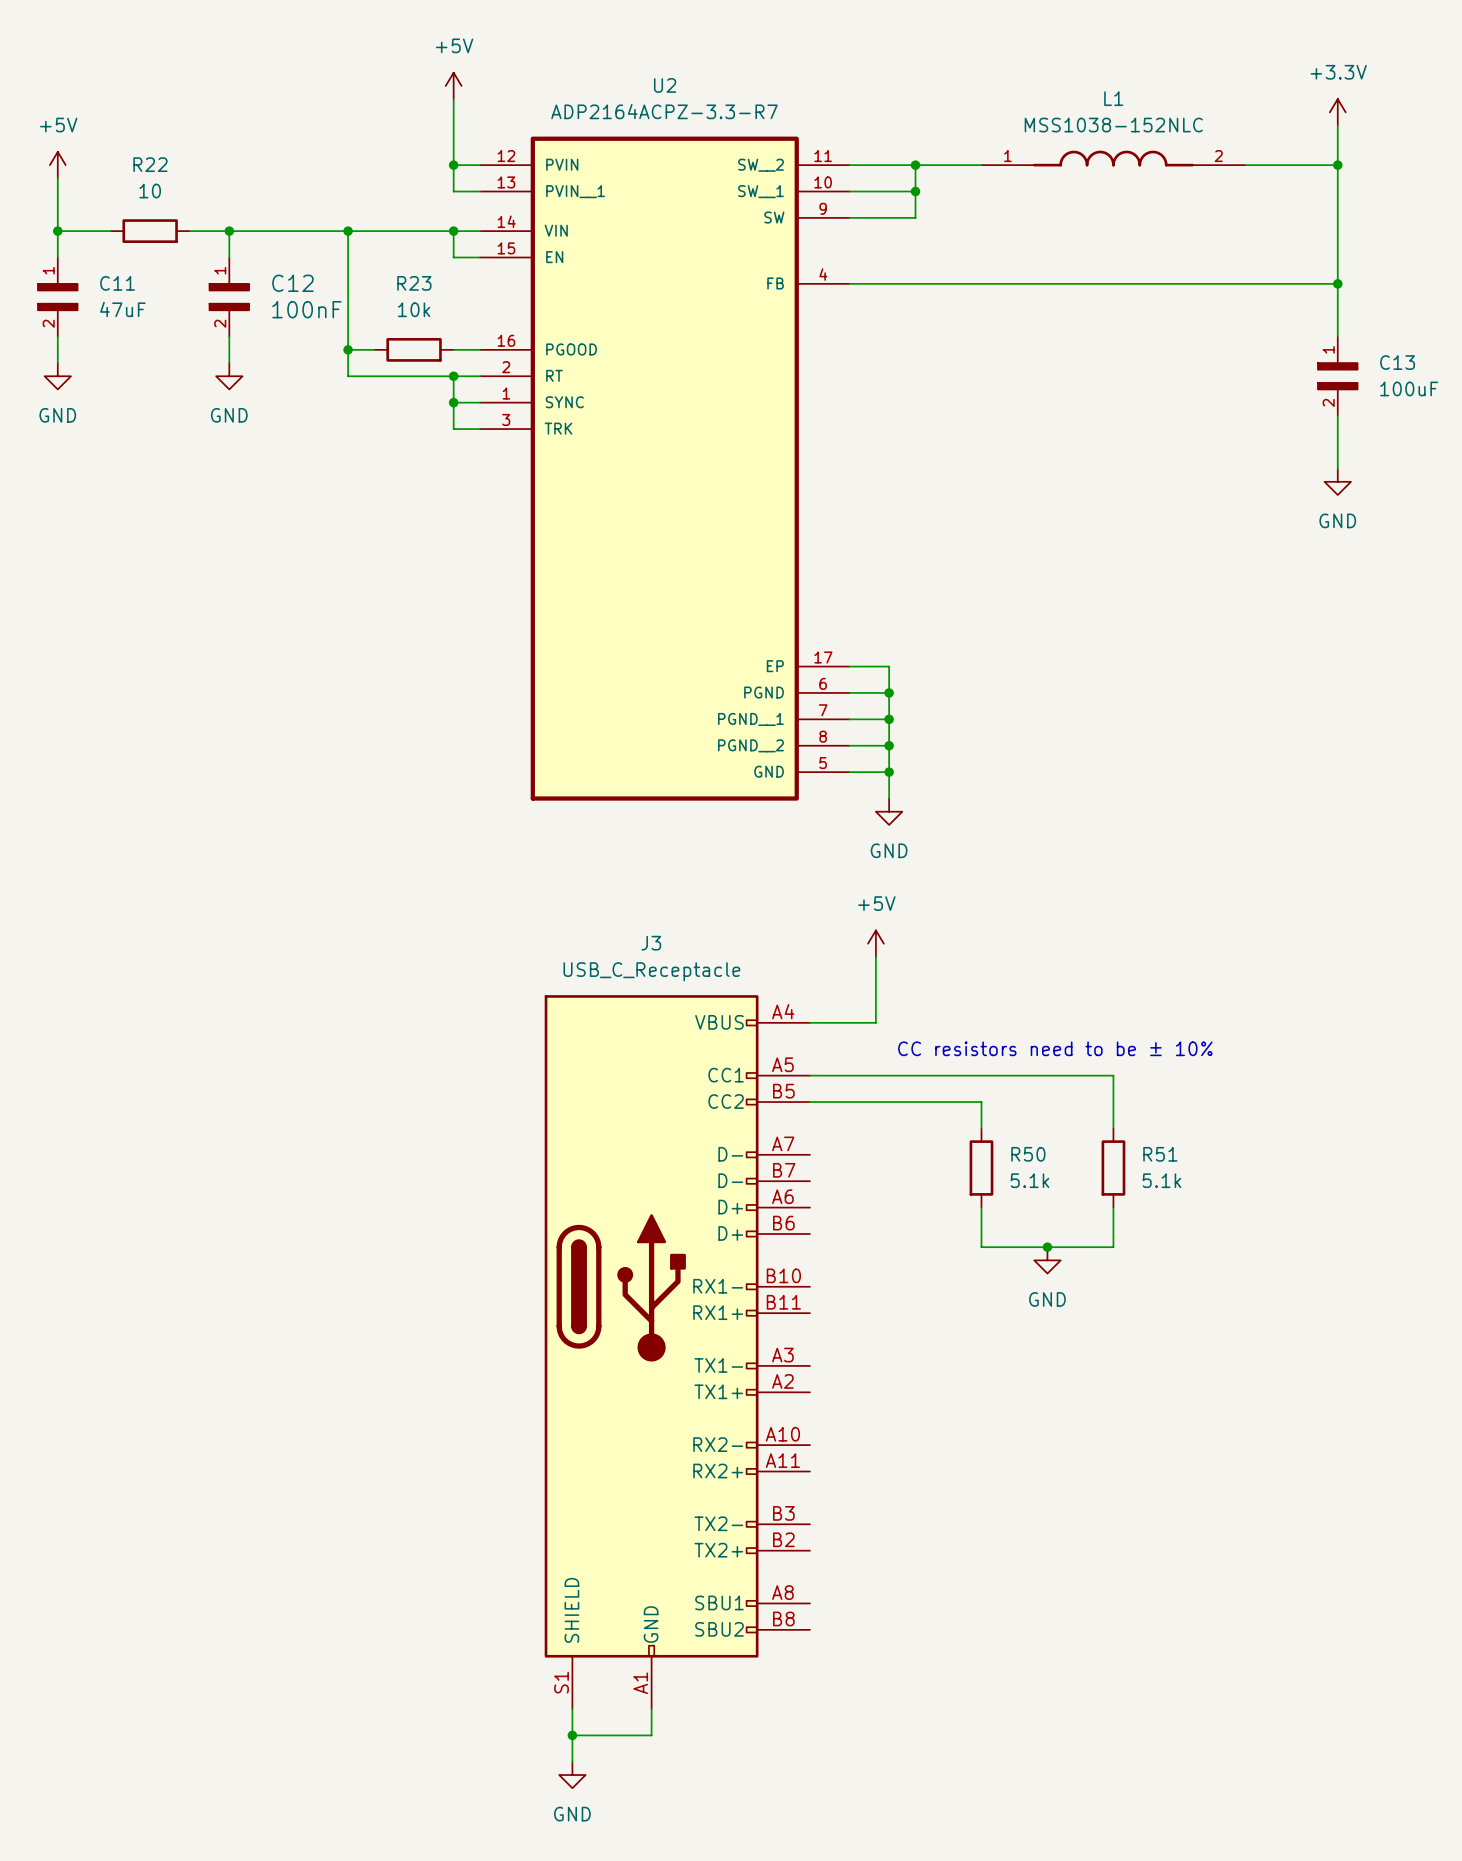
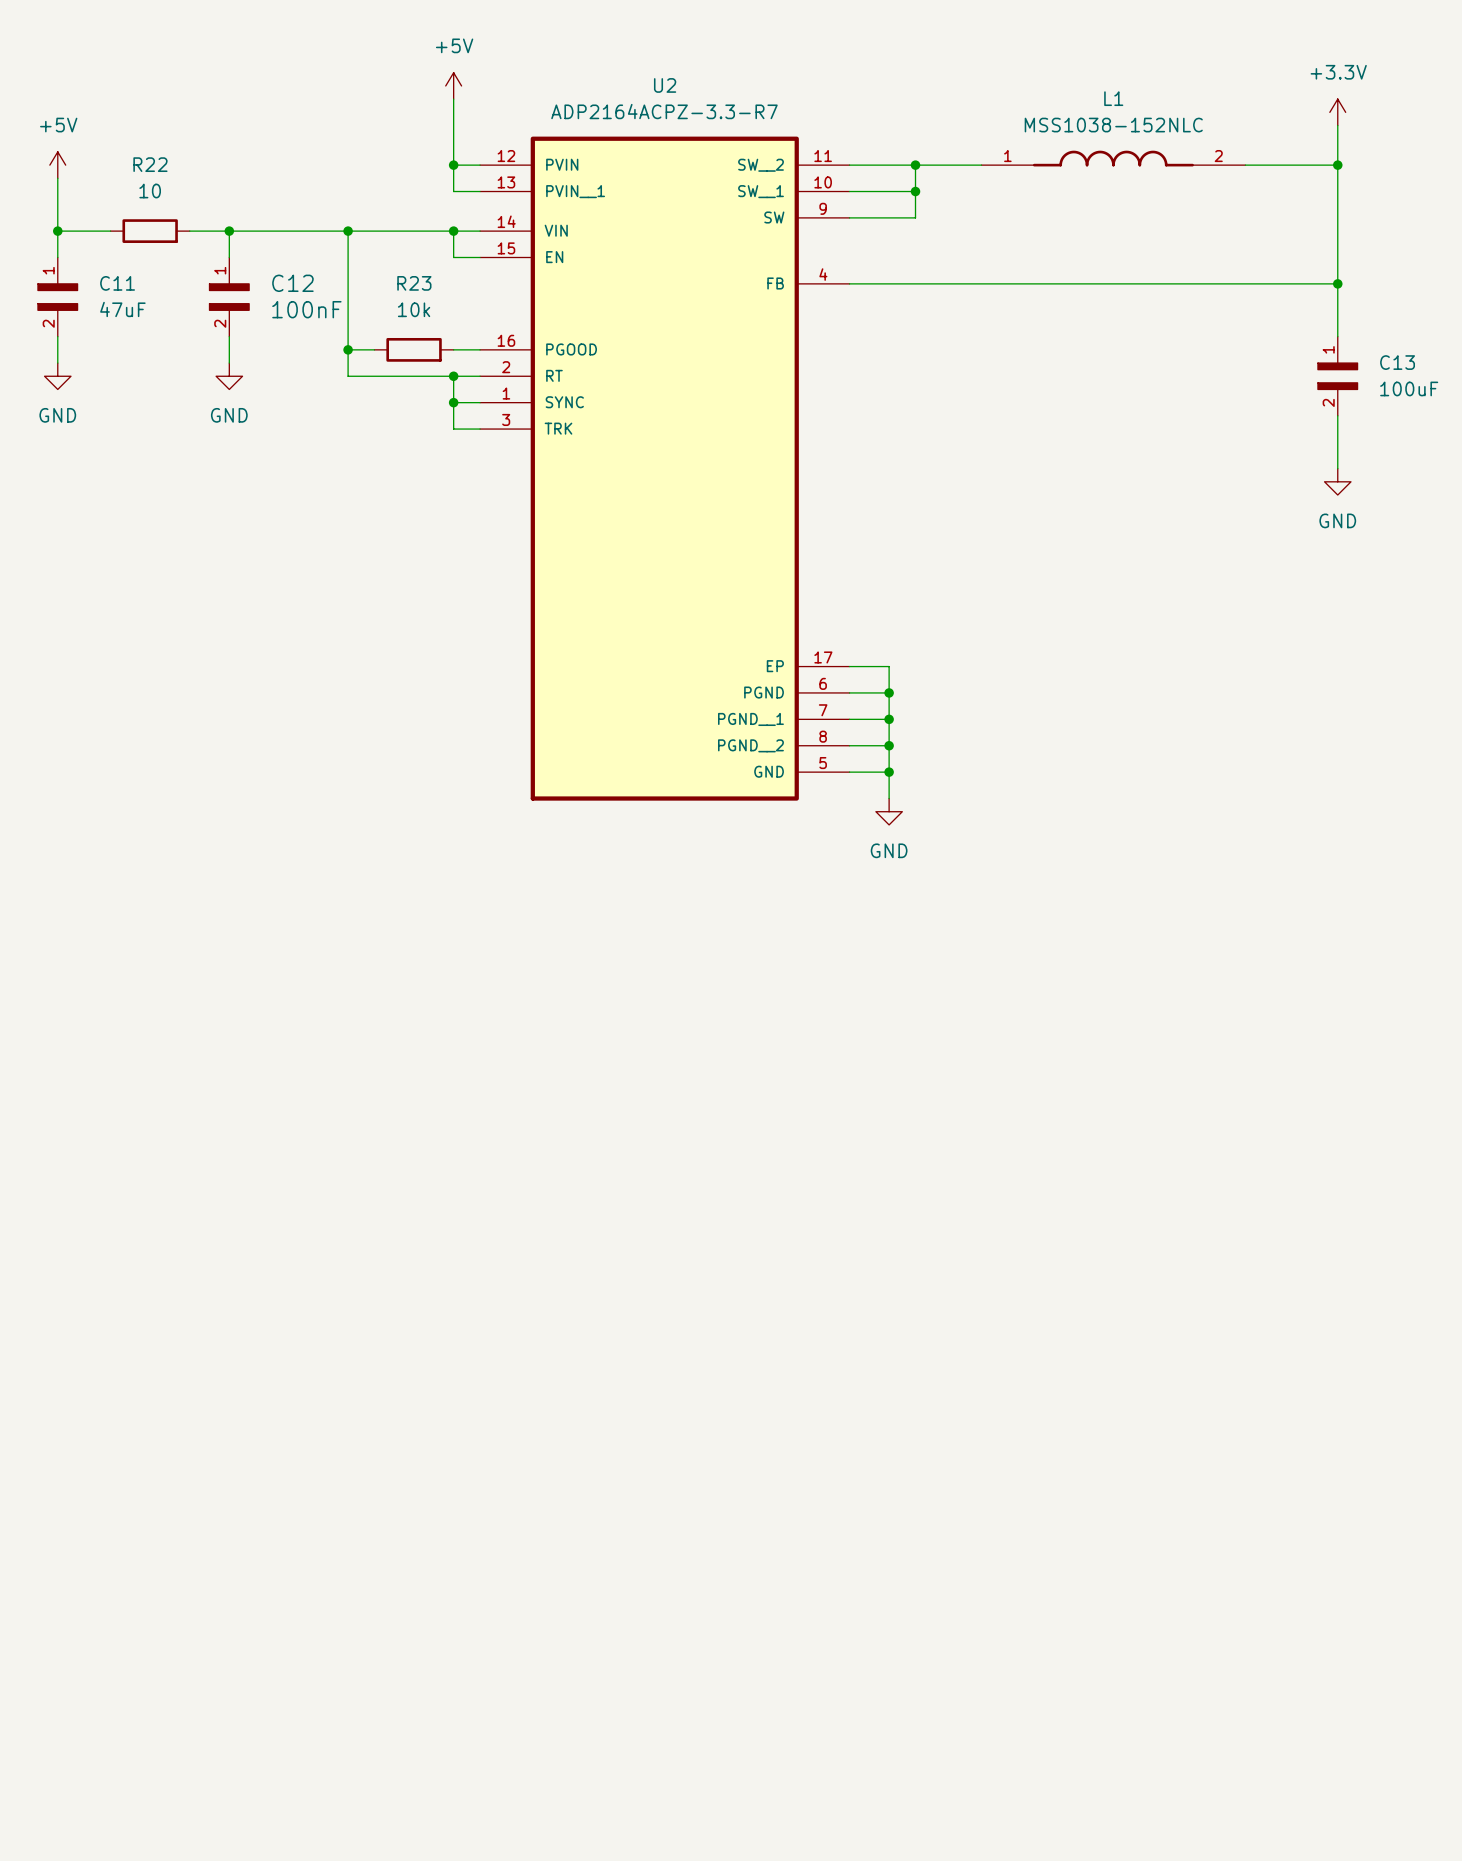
power symbol: +5V (875, 943) -> none
wire: (875, 956) (875, 1022) (809, 1022) -> none
text: CC resistors need to be ± 10% (1055, 1048) -> none
wire: (809, 1075) (1113, 1075) (1113, 1128) -> none
wire: (809, 1102) (981, 1102) (981, 1128) -> none
R50: 5.1k (981, 1168) -> none
R51: 5.1k (1113, 1168) -> none
wire: (981, 1207) (981, 1247) (1113, 1247) (1113, 1207) -> none
junction: (1047, 1247) -> none
power symbol: GND (1047, 1260) -> none
J3: USB_C_Receptacle (677, 1352) -> none
wire: (572, 1709) (572, 1761) -> none
wire: (651, 1709) (651, 1735) (572, 1735) -> none
junction: (572, 1735) -> none
power symbol: GND (572, 1775) -> none

